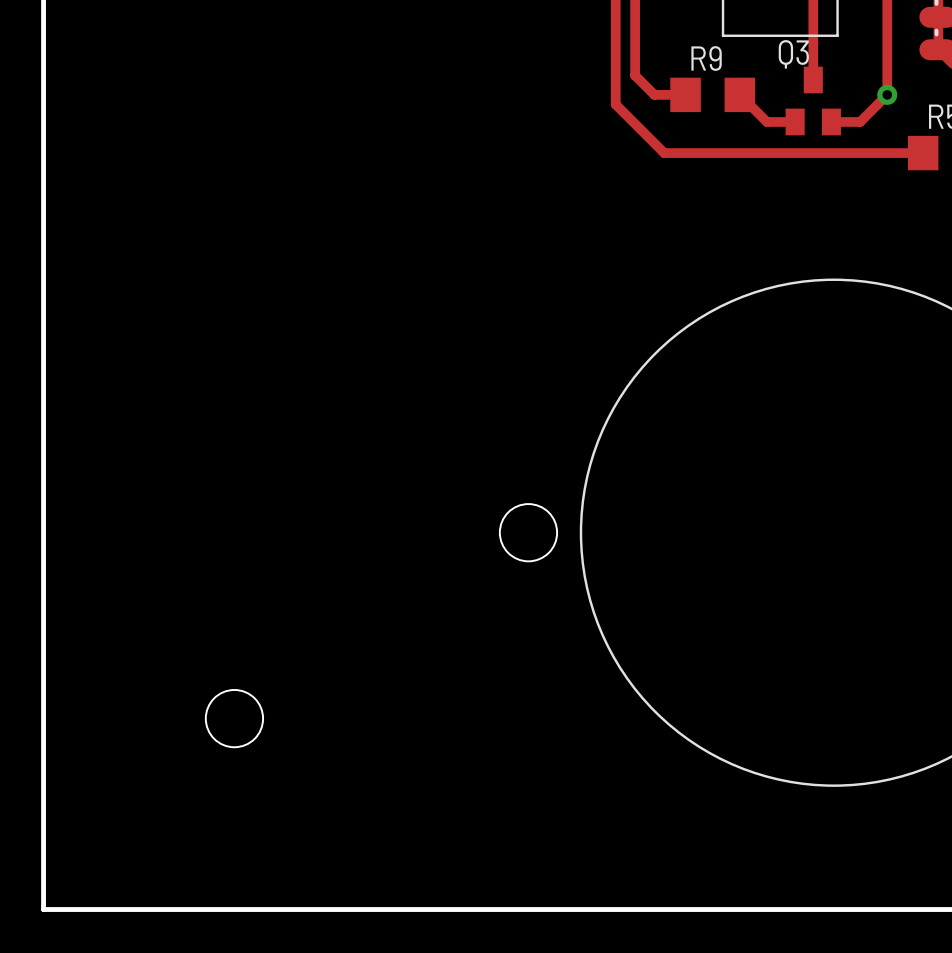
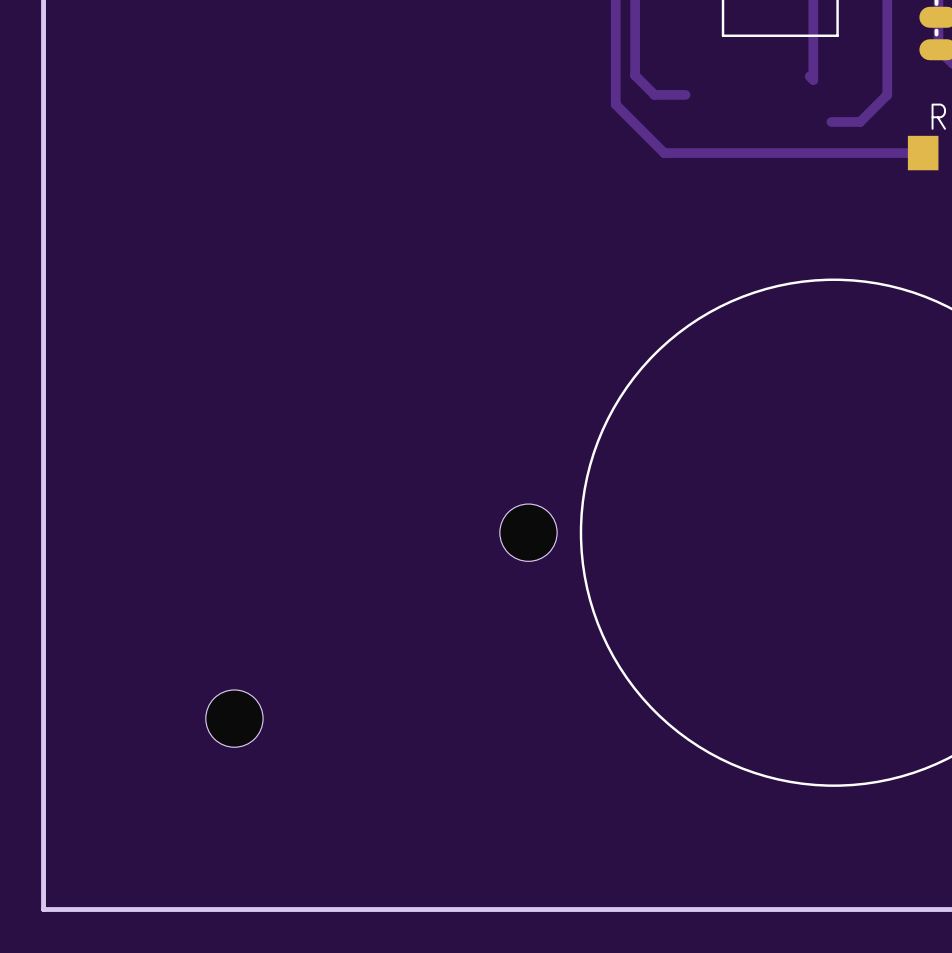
R9: (712, 94) -> none
track: (739, 94) (766, 121) (795, 121) -> none
via: (887, 94) -> none
Q3: (813, 100) -> none

